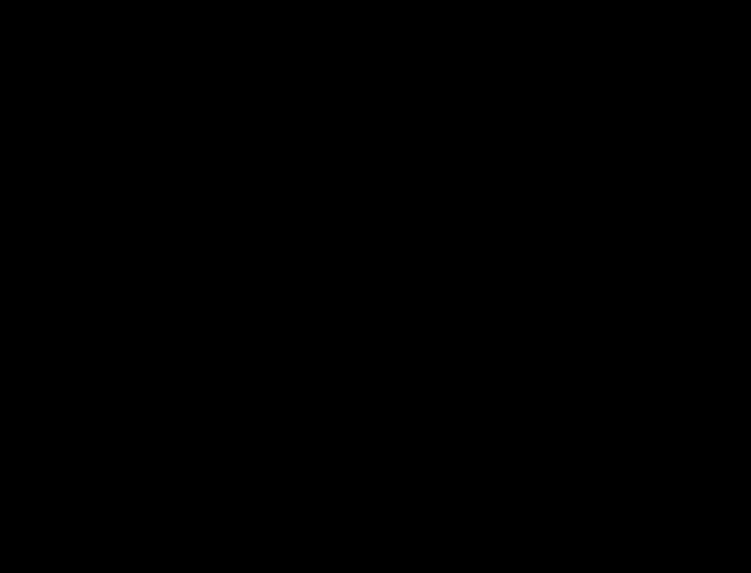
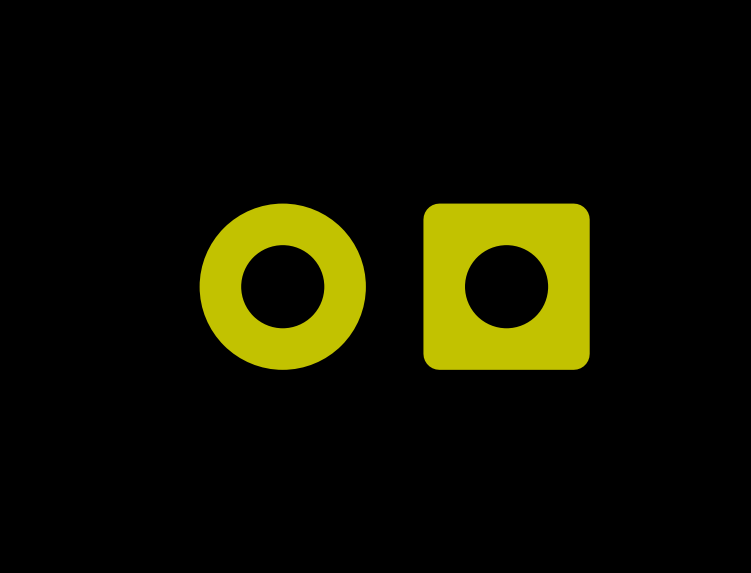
part: none -> (394, 286)

